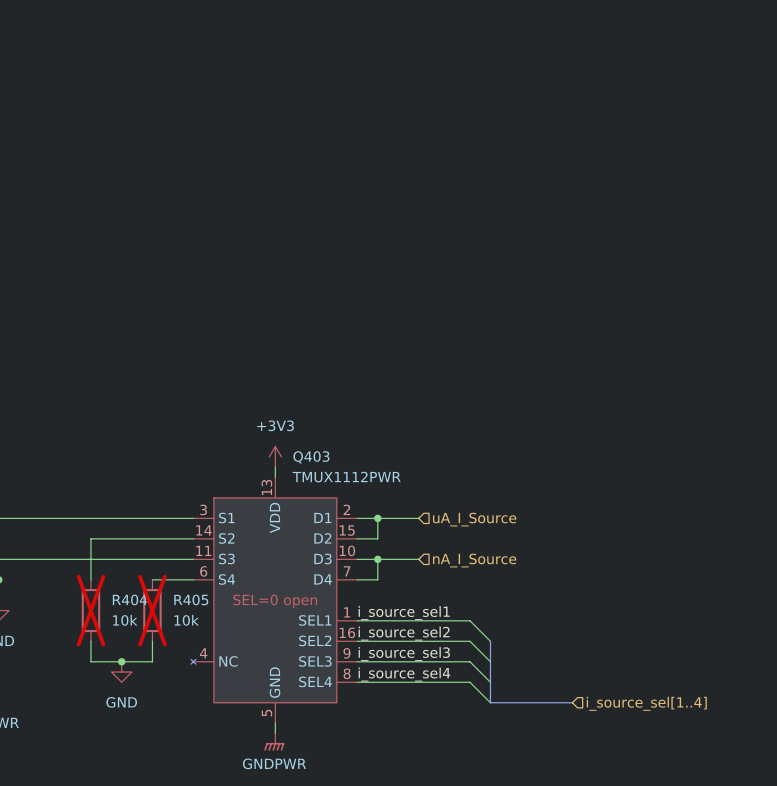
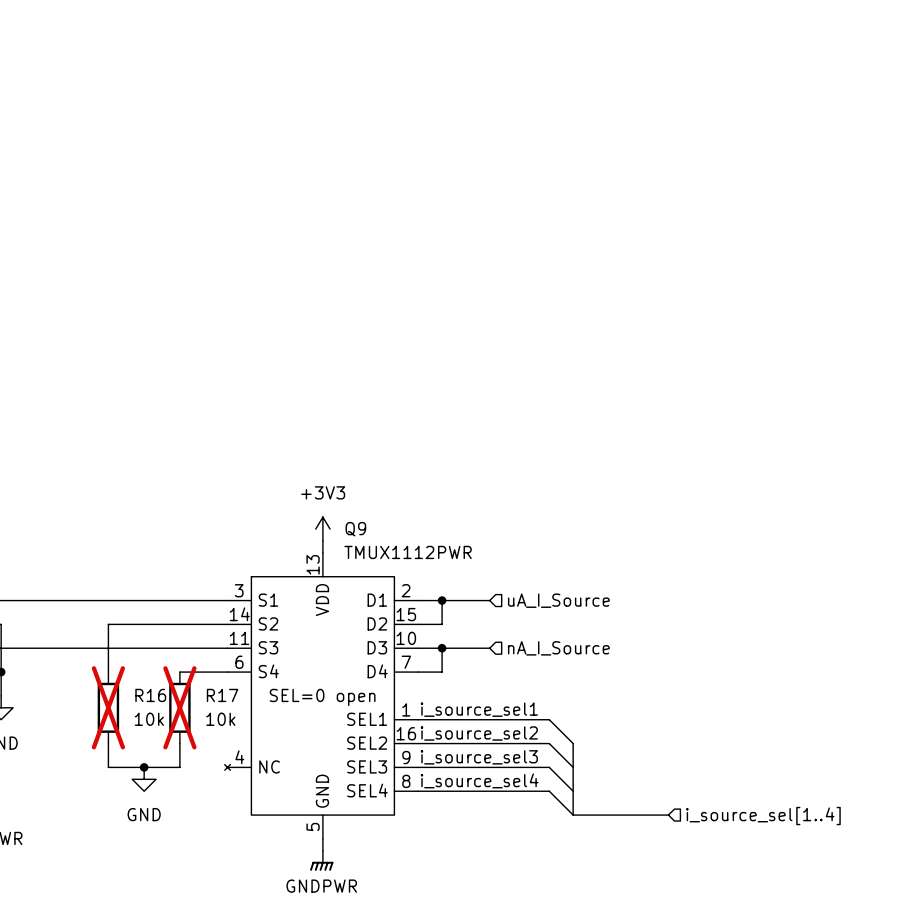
Q403 name: Q403 (311, 457) -> Q9 (355, 529)
R404 name: R404 (130, 599) -> R16 (150, 695)
R405 name: R405 (191, 599) -> R17 (222, 695)

